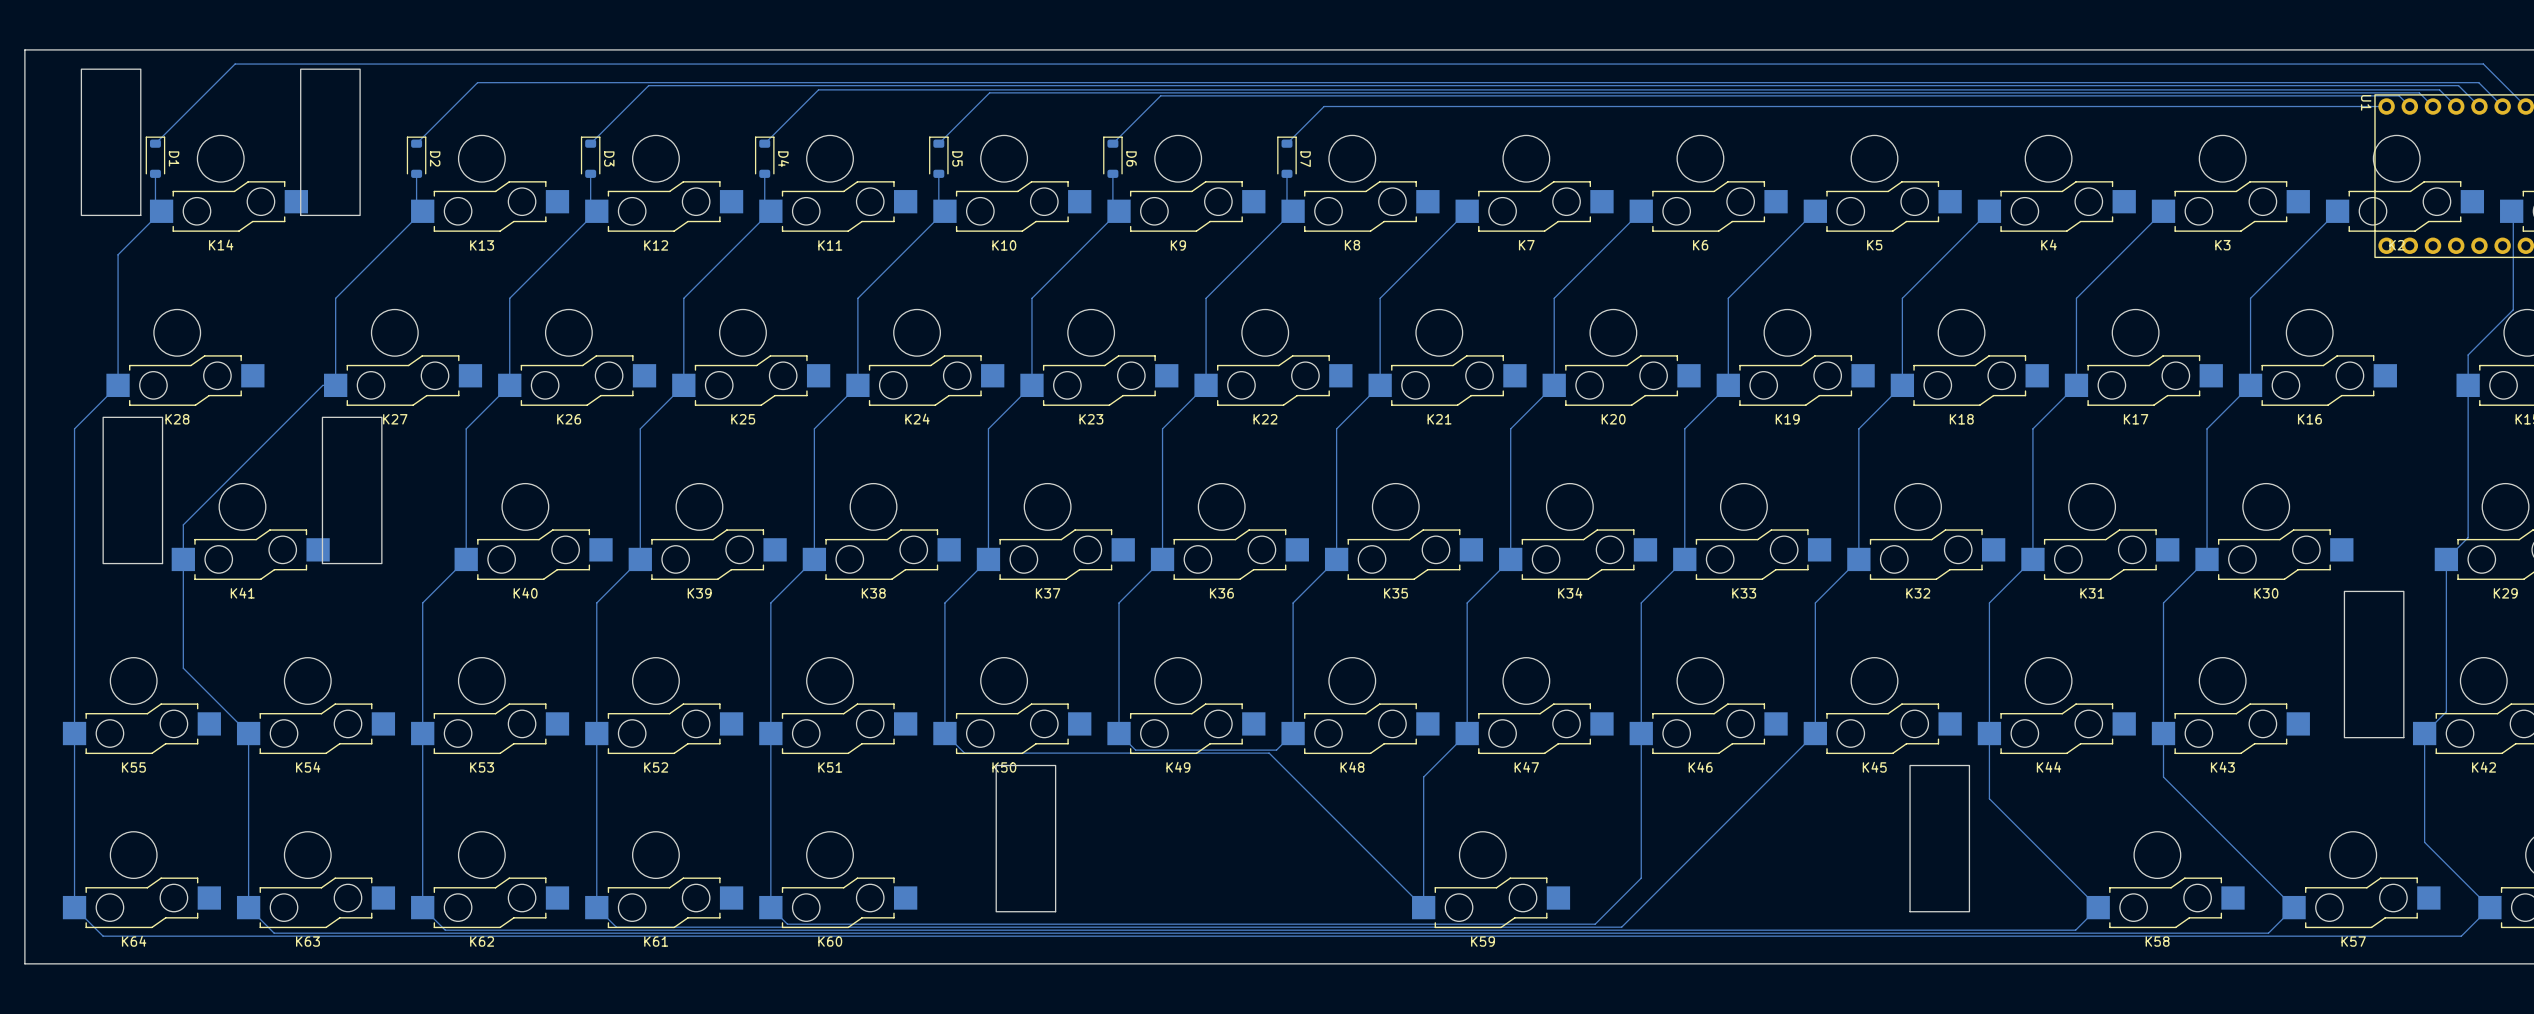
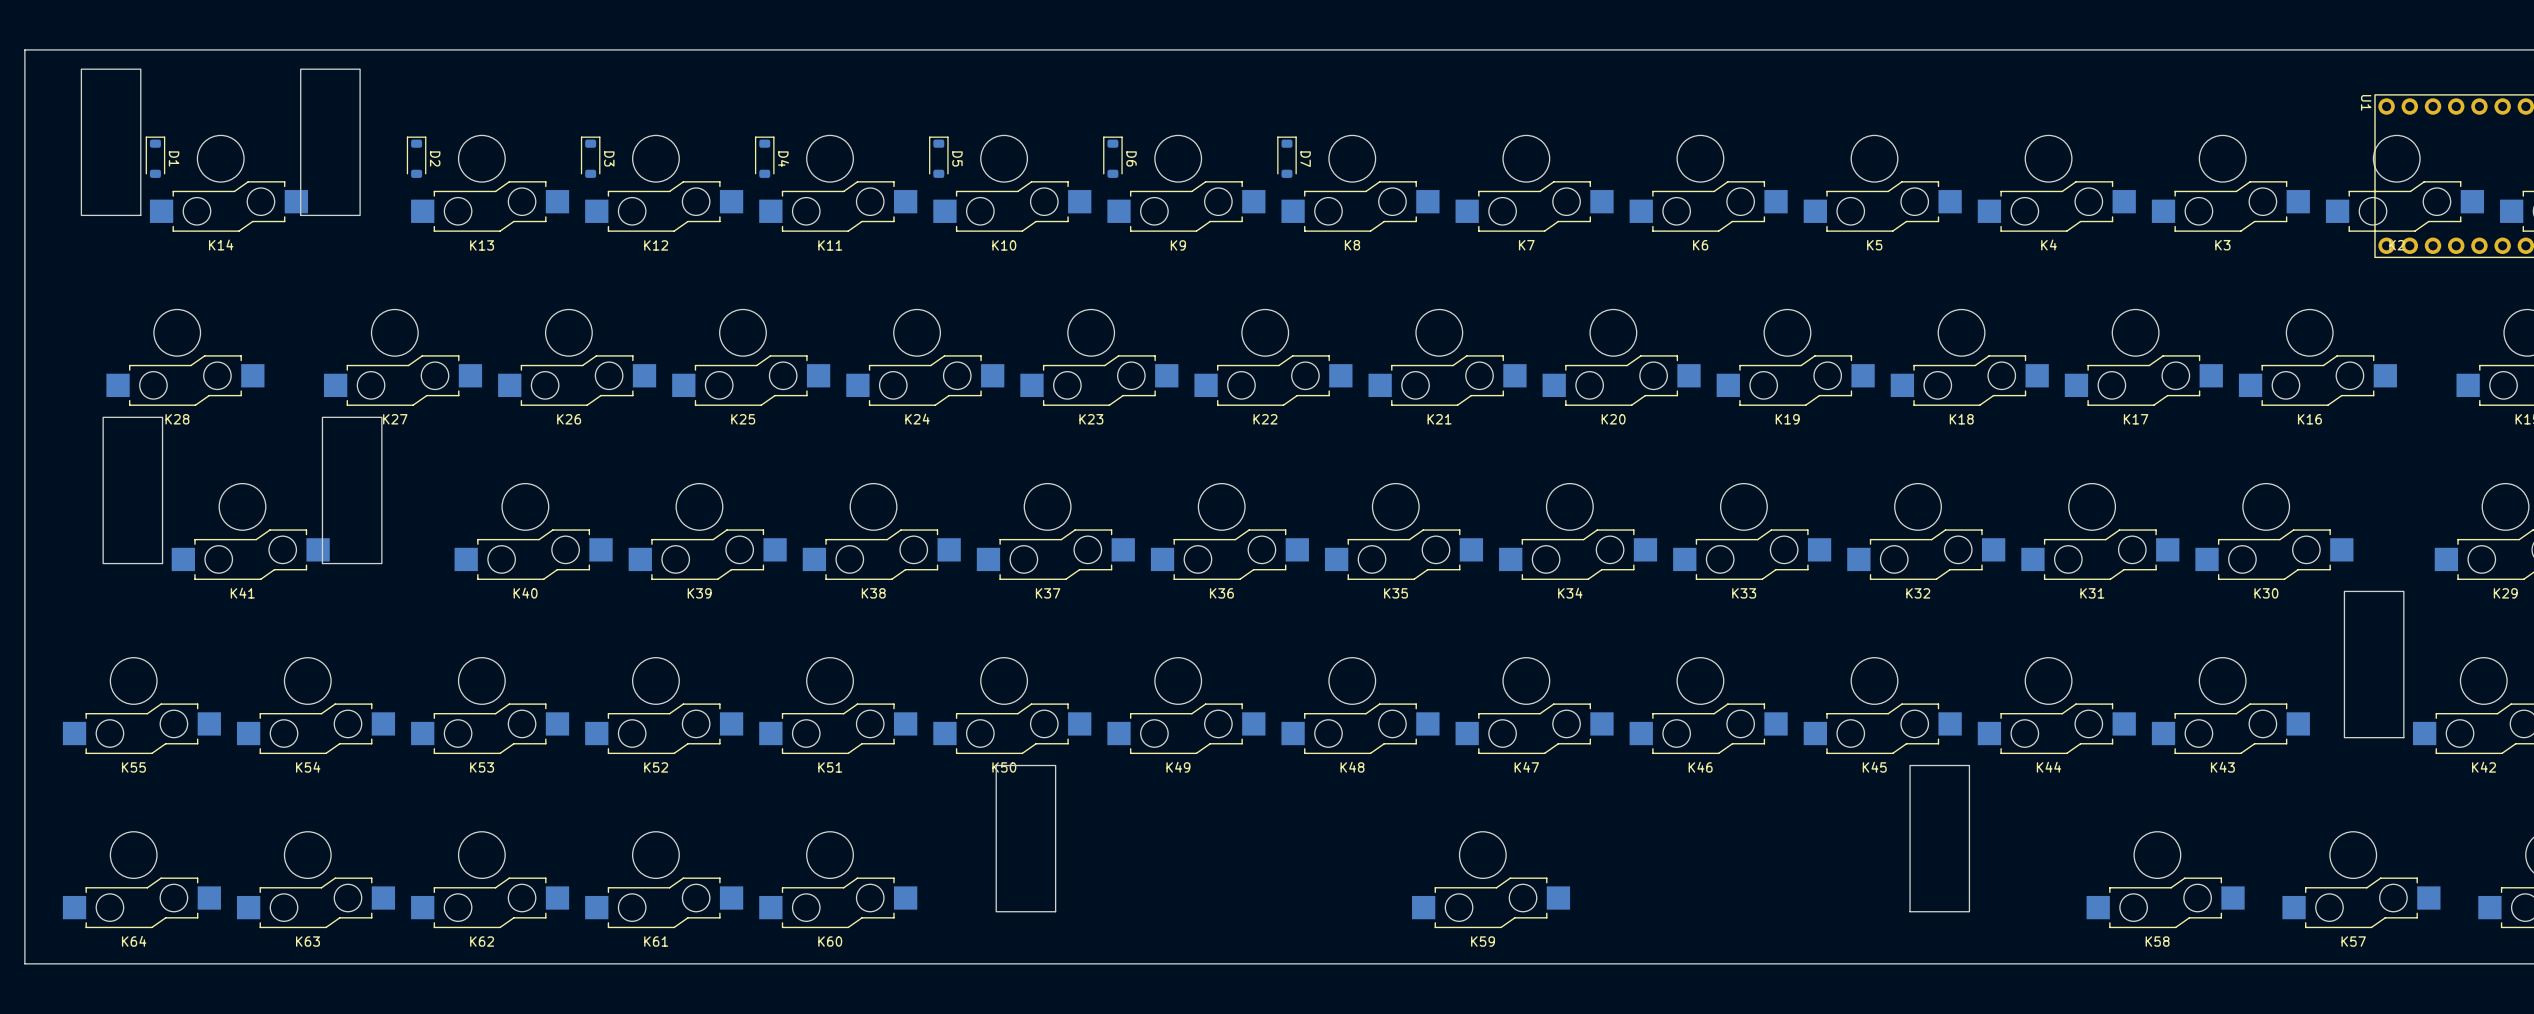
track: (2386, 106) (1324, 106) (1286, 143) -> none
track: (2409, 106) (2399, 95) (1160, 95) (1112, 143) -> none
track: (2433, 106) (2419, 92) (989, 92) (938, 143) -> none
track: (2456, 106) (2439, 89) (818, 89) (764, 143) -> none
track: (2479, 106) (2458, 85) (648, 85) (590, 143) -> none
track: (2502, 106) (2478, 82) (477, 82) (416, 143) -> none
track: (2525, 106) (2483, 64) (235, 64) (155, 143) -> none
track: (155, 173) (155, 205) (161, 211) (118, 254) (118, 385) (74, 428) (74, 907) (103, 936) (2461, 936) (2489, 907) (2424, 842) (2424, 733) (2446, 711) (2446, 559) (2468, 537) (2468, 354) (2513, 309) (2513, 212) (2511, 211) -> none
track: (416, 173) (416, 205) (422, 211) (335, 298) (335, 385) (322, 385) (183, 524) (183, 668) (248, 733) (248, 907) (274, 933) (2268, 933) (2294, 907) (2163, 777) (2163, 602) (2207, 559) (2207, 428) (2250, 385) (2250, 298) (2337, 211) -> none
track: (590, 173) (590, 205) (596, 211) (509, 298) (509, 385) (466, 428) (466, 559) (422, 602) (422, 907) (445, 930) (2075, 930) (2098, 907) (1989, 798) (1989, 602) (2032, 559) (2032, 428) (2076, 385) (2076, 298) (2163, 211) -> none
track: (764, 173) (764, 205) (770, 211) (683, 298) (683, 385) (640, 428) (640, 559) (596, 602) (596, 907) (616, 927) (1621, 927) (1815, 733) (1815, 602) (1858, 559) (1858, 428) (1902, 385) (1902, 298) (1989, 211) -> none
track: (938, 173) (938, 205) (944, 211) (857, 298) (857, 385) (814, 428) (814, 559) (770, 602) (770, 907) (787, 924) (1595, 924) (1641, 878) (1641, 602) (1684, 559) (1684, 428) (1728, 385) (1728, 298) (1815, 211) -> none
track: (1112, 173) (1112, 205) (1119, 211) (1031, 298) (1031, 385) (988, 428) (988, 559) (944, 602) (944, 733) (964, 753) (1269, 753) (1423, 907) (1423, 777) (1467, 733) (1467, 602) (1510, 559) (1510, 428) (1554, 385) (1554, 298) (1641, 211) -> none
track: (1286, 173) (1286, 205) (1293, 211) (1206, 298) (1206, 385) (1162, 428) (1162, 559) (1119, 602) (1119, 733) (1135, 750) (1276, 750) (1293, 733) (1293, 602) (1336, 559) (1336, 428) (1380, 385) (1380, 298) (1467, 211) -> none

